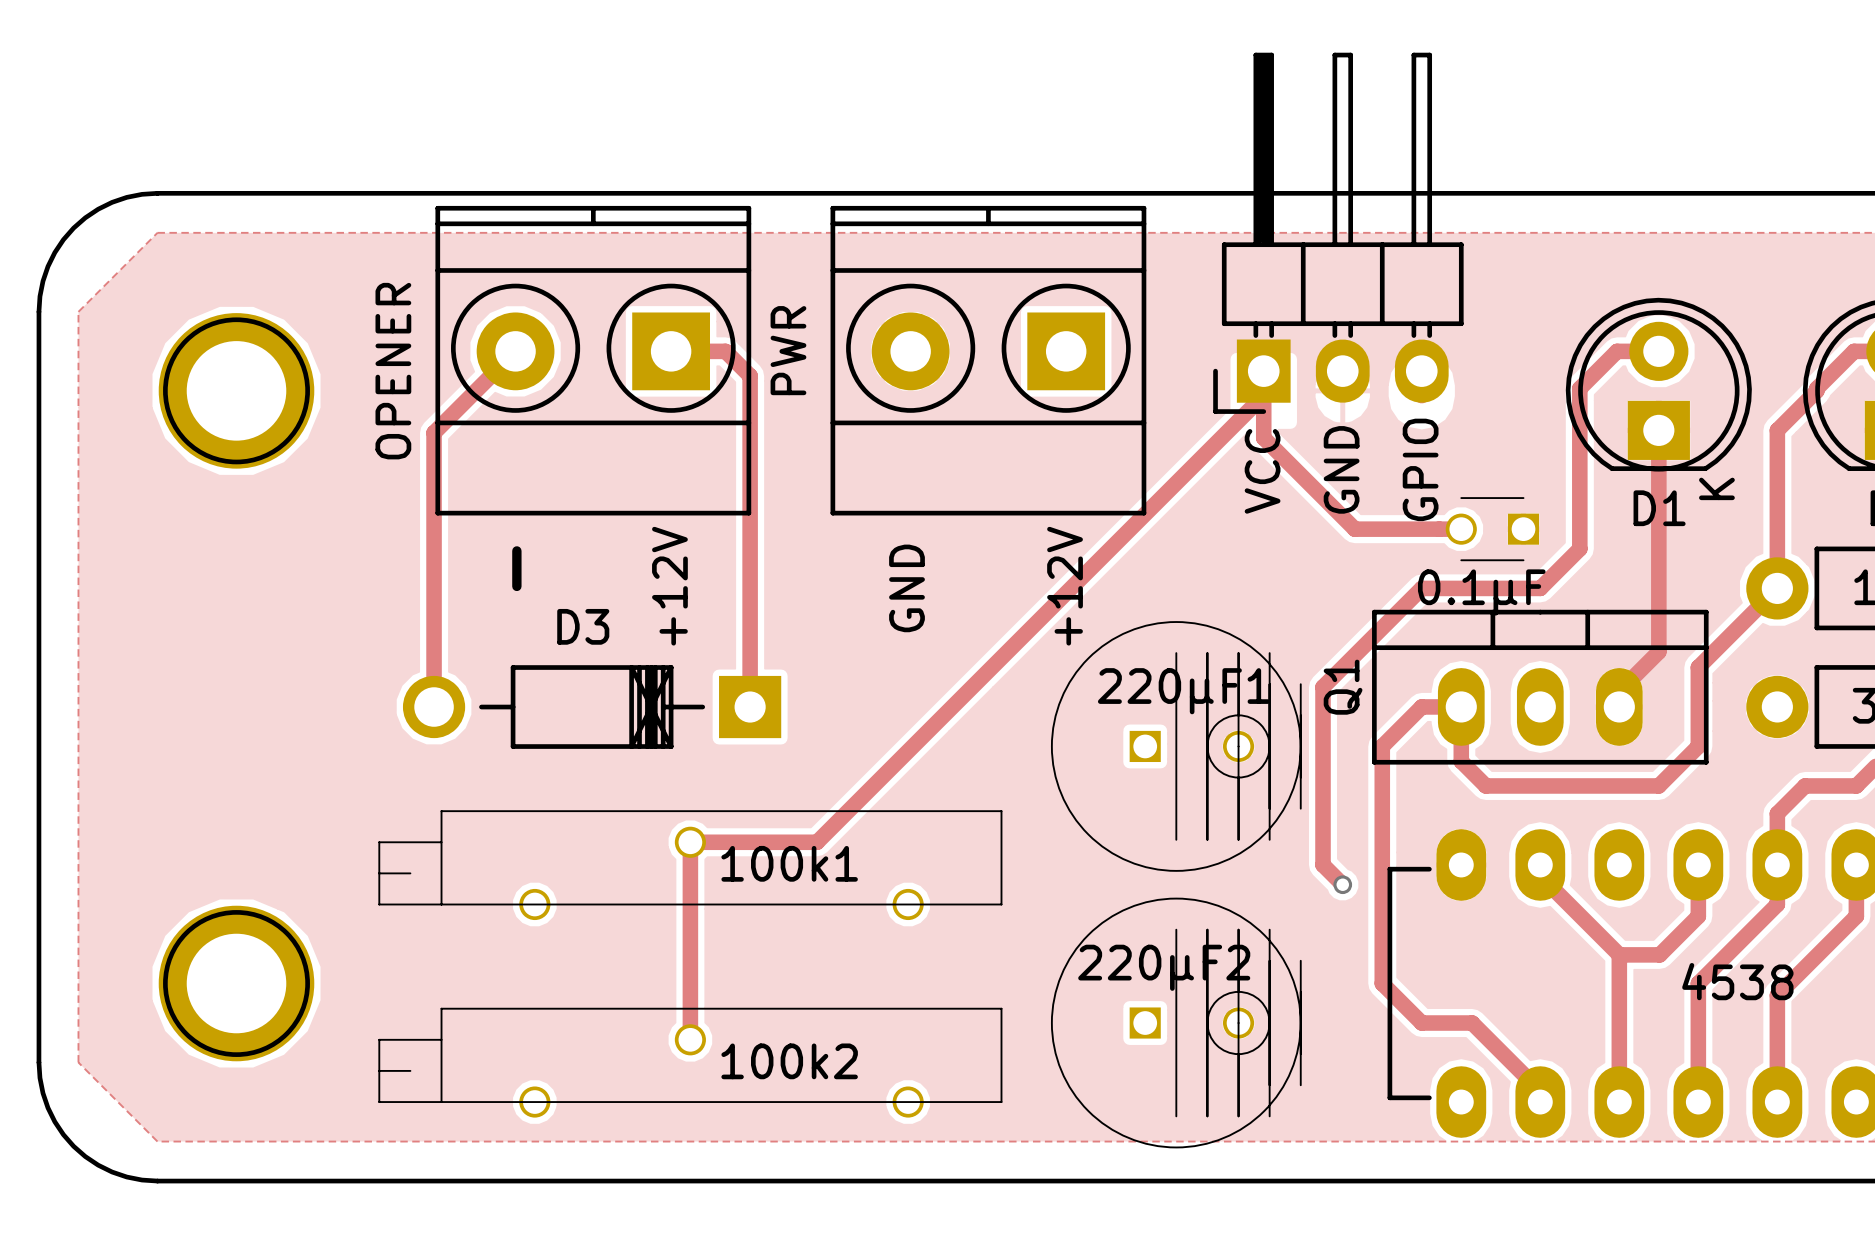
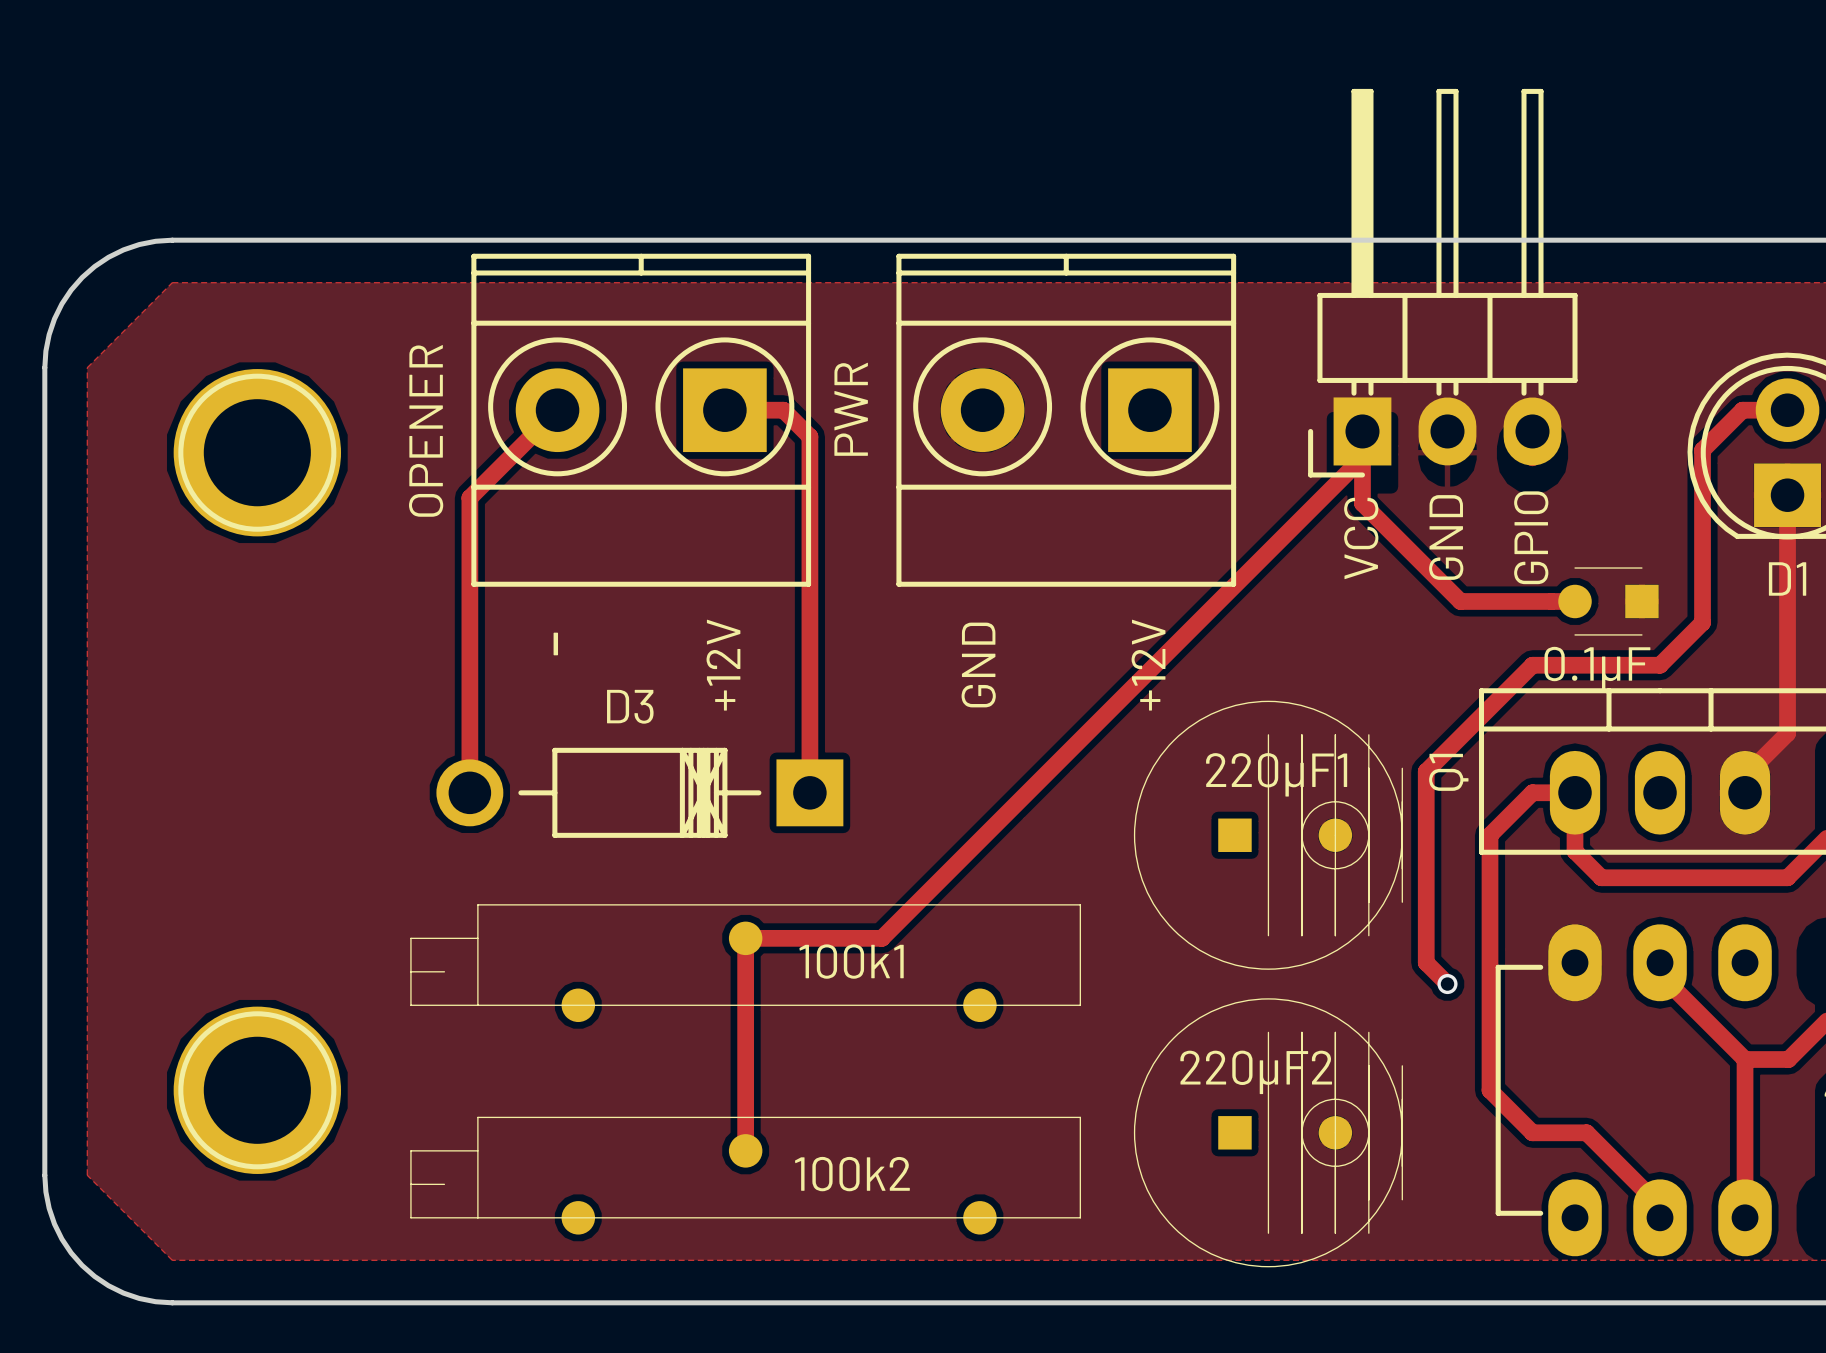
0.1µF footprint: [1445, 498, 1540, 561] -> [1558, 568, 1659, 635]
220µF1 footprint: [1051, 622, 1301, 871] -> [1134, 701, 1403, 970]
100k1 footprint: [379, 811, 1002, 921] -> [410, 904, 1081, 1023]
220µF2 footprint: [1051, 898, 1301, 1148] -> [1134, 998, 1403, 1267]
100k2 footprint: [379, 1008, 1002, 1118] -> [410, 1117, 1081, 1235]

